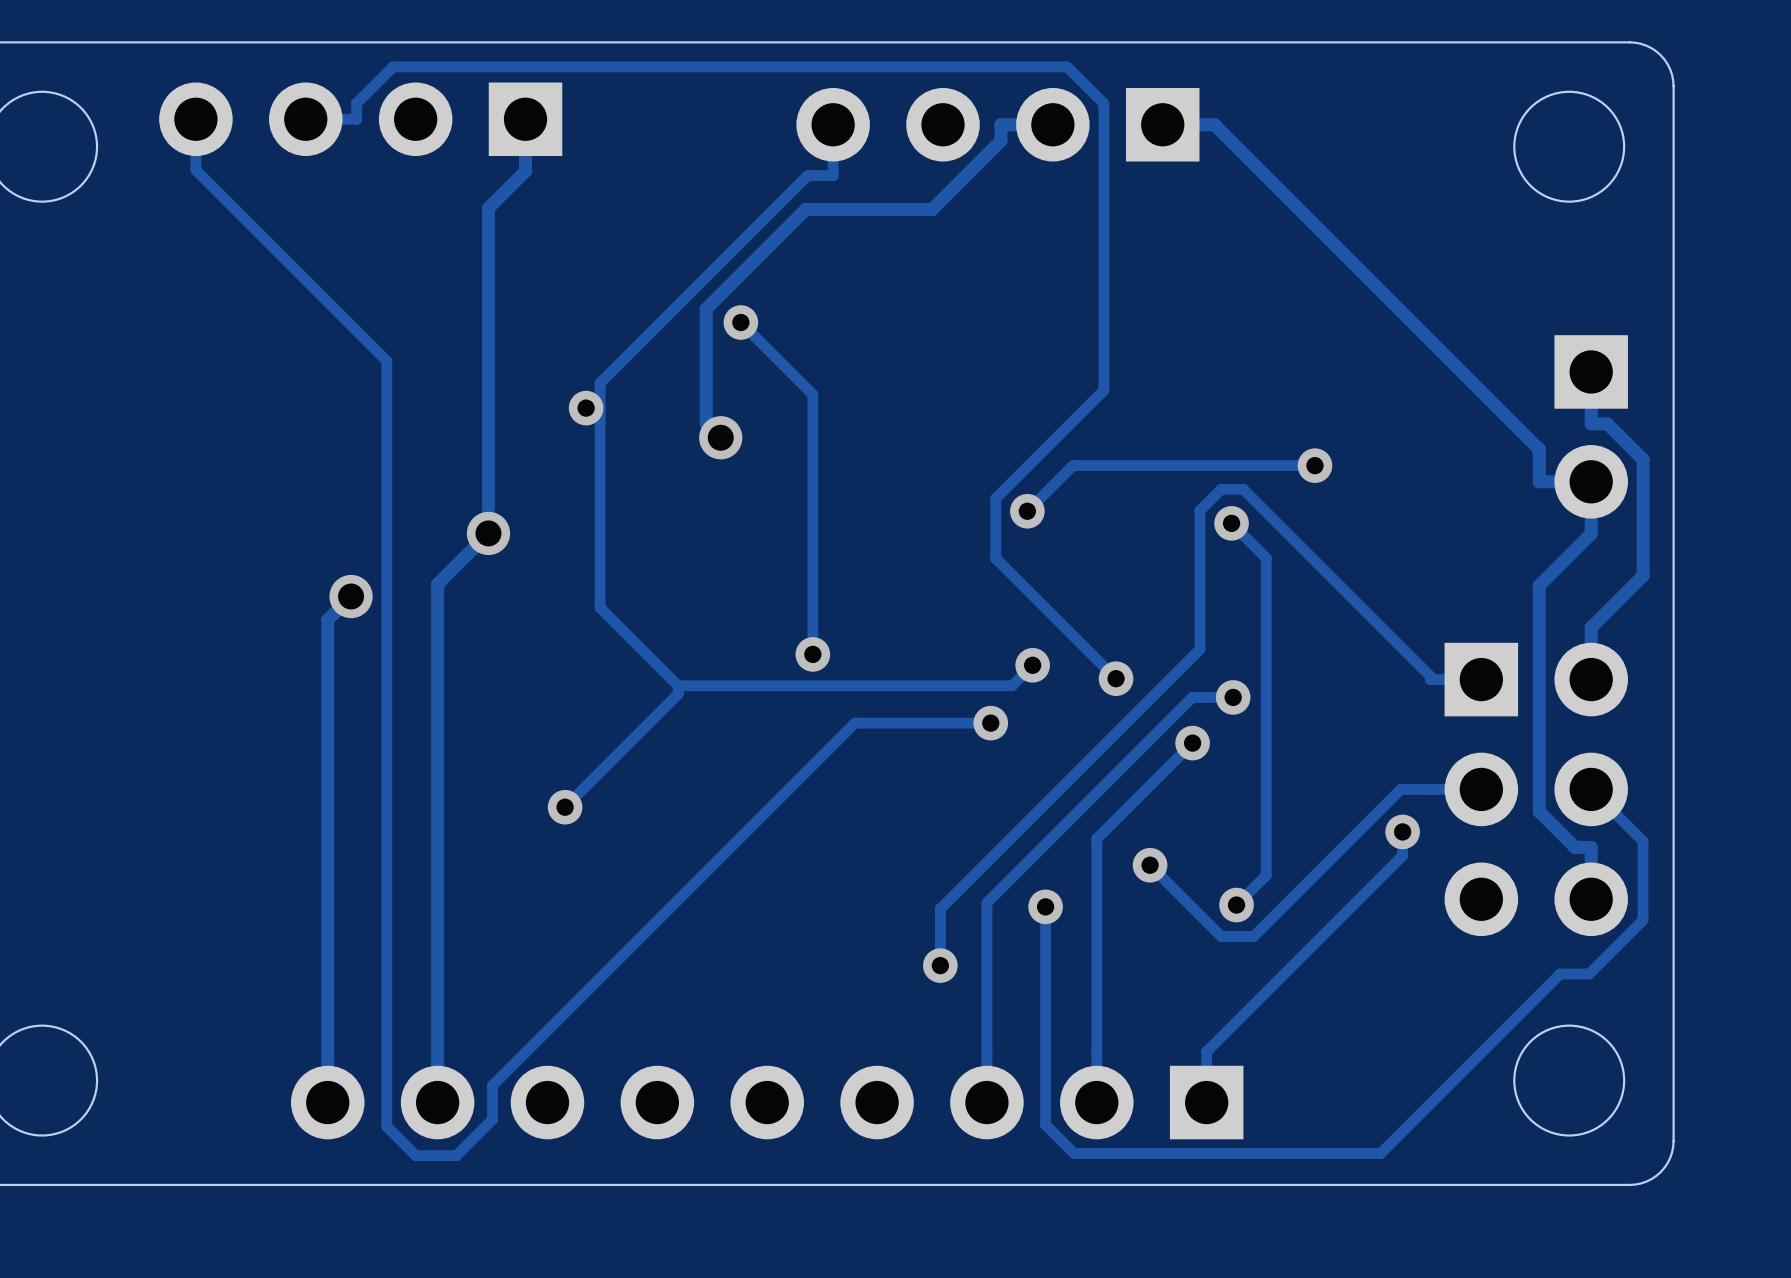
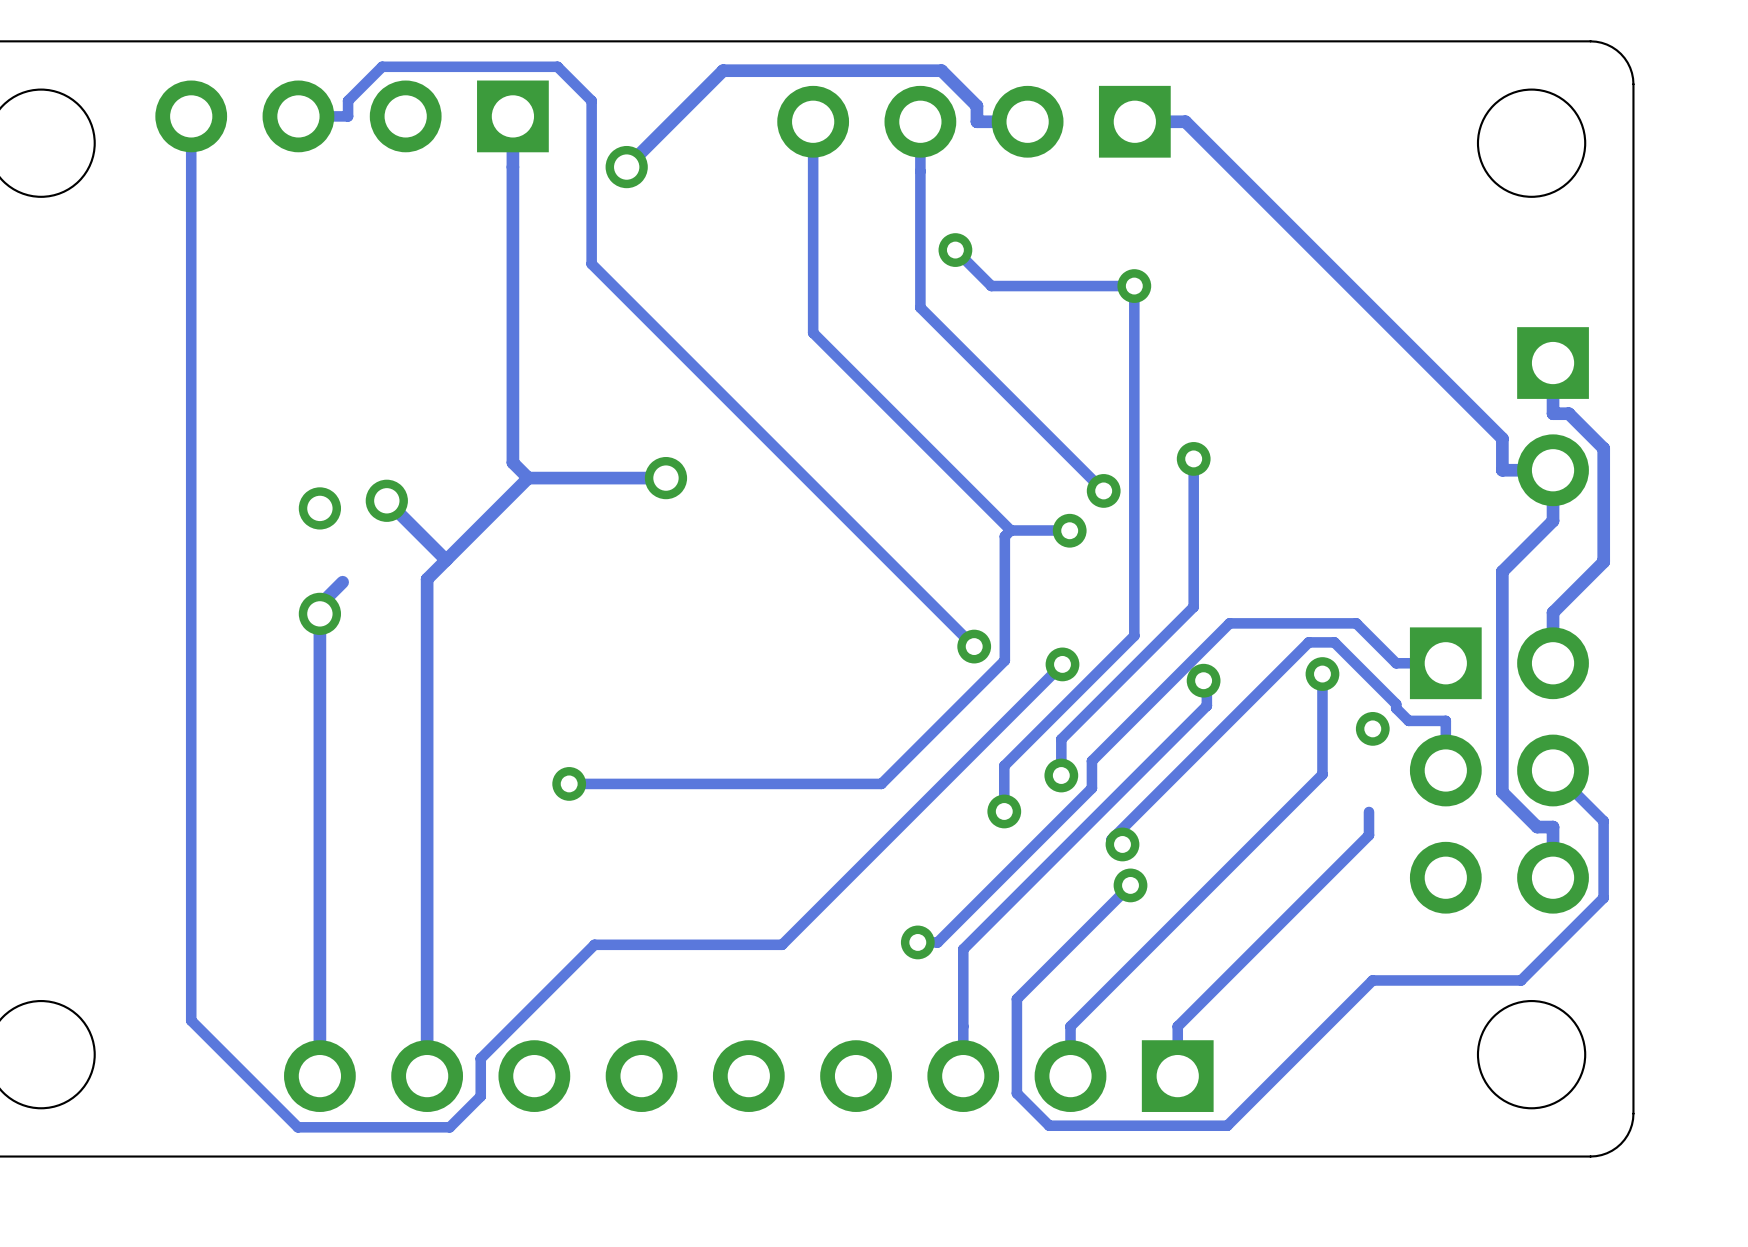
track: (391, 68) (393, 66) (1067, 66) (1103, 103) (1103, 390) (995, 498) (995, 558) (1116, 678) -> (382, 66) (557, 66) (591, 100) (591, 264) (974, 646)
track: none -> (920, 121) (920, 307) (1103, 490)
track: (1000, 124) (1000, 140) (932, 209) (805, 209) (706, 308) (706, 423) (720, 437) -> (976, 121) (976, 106) (941, 70) (723, 70) (626, 167)
track: (195, 170) (386, 360) (386, 1126) (415, 1155) (456, 1155) (492, 1119) -> (191, 166) (191, 1020) (297, 1127) (449, 1127) (480, 1096) (480, 1092)
track: (525, 171) (488, 208) (488, 533) (437, 584) (437, 593) -> (512, 167) (512, 462) (528, 478)
via: none -> (626, 167)
track: (833, 175) (807, 175) (600, 383) (600, 607) (678, 685) -> (813, 171) (813, 332) (1010, 530)
track: none -> (955, 250) (991, 286) (1134, 286) (1134, 635) (1004, 765) (1004, 811)
via: none -> (955, 250)
via: none -> (1134, 286)
track: (740, 322) (812, 394) (812, 654) -> none
via: (740, 322) -> none
via: (586, 408) -> none
via position: (720, 437) -> (665, 478)
track: (1314, 465) (1072, 465) (1027, 511) -> none
via: (1314, 465) -> none
track: none -> (1193, 458) (1193, 606) (1061, 739) (1061, 775)
via: none -> (1193, 458)
track: none -> (528, 478) (427, 579)
track: none -> (665, 478) (528, 478)
via: none -> (1103, 490)
via: (1027, 511) -> none
track: none -> (386, 500) (446, 560)
via: none -> (386, 500)
via: none -> (319, 508)
track: (1231, 523) (1266, 558) (1266, 875) (1236, 905) -> none
via: (1231, 523) -> none
via: (488, 533) -> none
track: none -> (1010, 530) (1004, 536) (1004, 660) (881, 783) (569, 783)
track: none -> (1069, 530) (1010, 530)
via: none -> (1069, 530)
via position: (351, 596) -> (319, 613)
via: (812, 654) -> none
track: (1032, 665) (1012, 685) (678, 685) -> none
via position: (1032, 665) -> (974, 646)
via position: (1116, 678) -> (1062, 664)
track: (1430, 679) (1430, 676) (1243, 489) (1221, 489) (1199, 510) (1199, 649) (940, 908) (940, 965) -> (1396, 663) (1356, 623) (1229, 623) (1091, 761) (1091, 788) (937, 942) (930, 942)
track: (678, 685) (678, 694) (565, 807) -> none
via: none -> (1322, 674)
track: (1233, 697) (1192, 697) (986, 902) (986, 972) -> (1206, 691) (1206, 705) (963, 949)
track: (990, 723) (854, 723) (492, 1085) -> (1062, 664) (782, 944) (594, 944) (480, 1059)
via: (990, 723) -> none
track: (1192, 743) (1096, 838) (1096, 1051) -> (1322, 674) (1322, 774) (1070, 1026)
via: (1192, 743) -> none
via: none -> (1372, 728)
track: (1481, 789) (1400, 789) (1253, 936) (1221, 936) (1150, 865) -> (1445, 770) (1445, 720) (1408, 720) (1396, 708) (1396, 704) (1334, 642) (1308, 642) (1111, 839) (1111, 844)
via: none -> (1061, 775)
via position: (565, 807) -> (569, 783)
via: none -> (1004, 811)
via: (1402, 831) -> none
via: (1236, 905) -> none
track: (1045, 906) (1045, 1124) (1075, 1153) -> (1130, 885) (1016, 999) (1016, 1093) (1049, 1125)
via: (1045, 906) -> none
via: none -> (1130, 885)
track: (1643, 920) (1589, 973) (1560, 973) (1380, 1153) (1257, 1153) -> (1603, 897) (1521, 980) (1372, 980) (1227, 1125)

